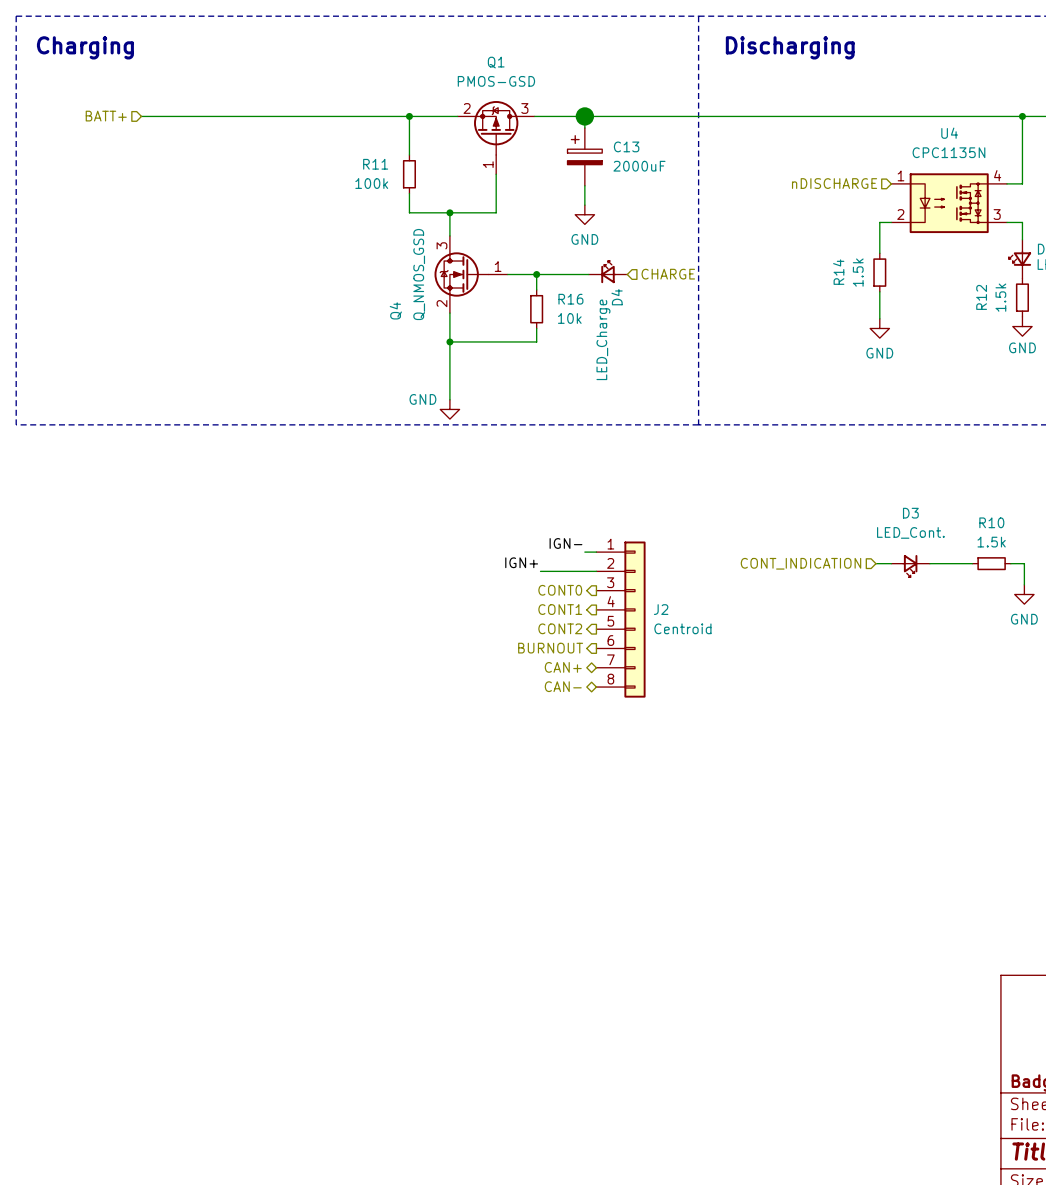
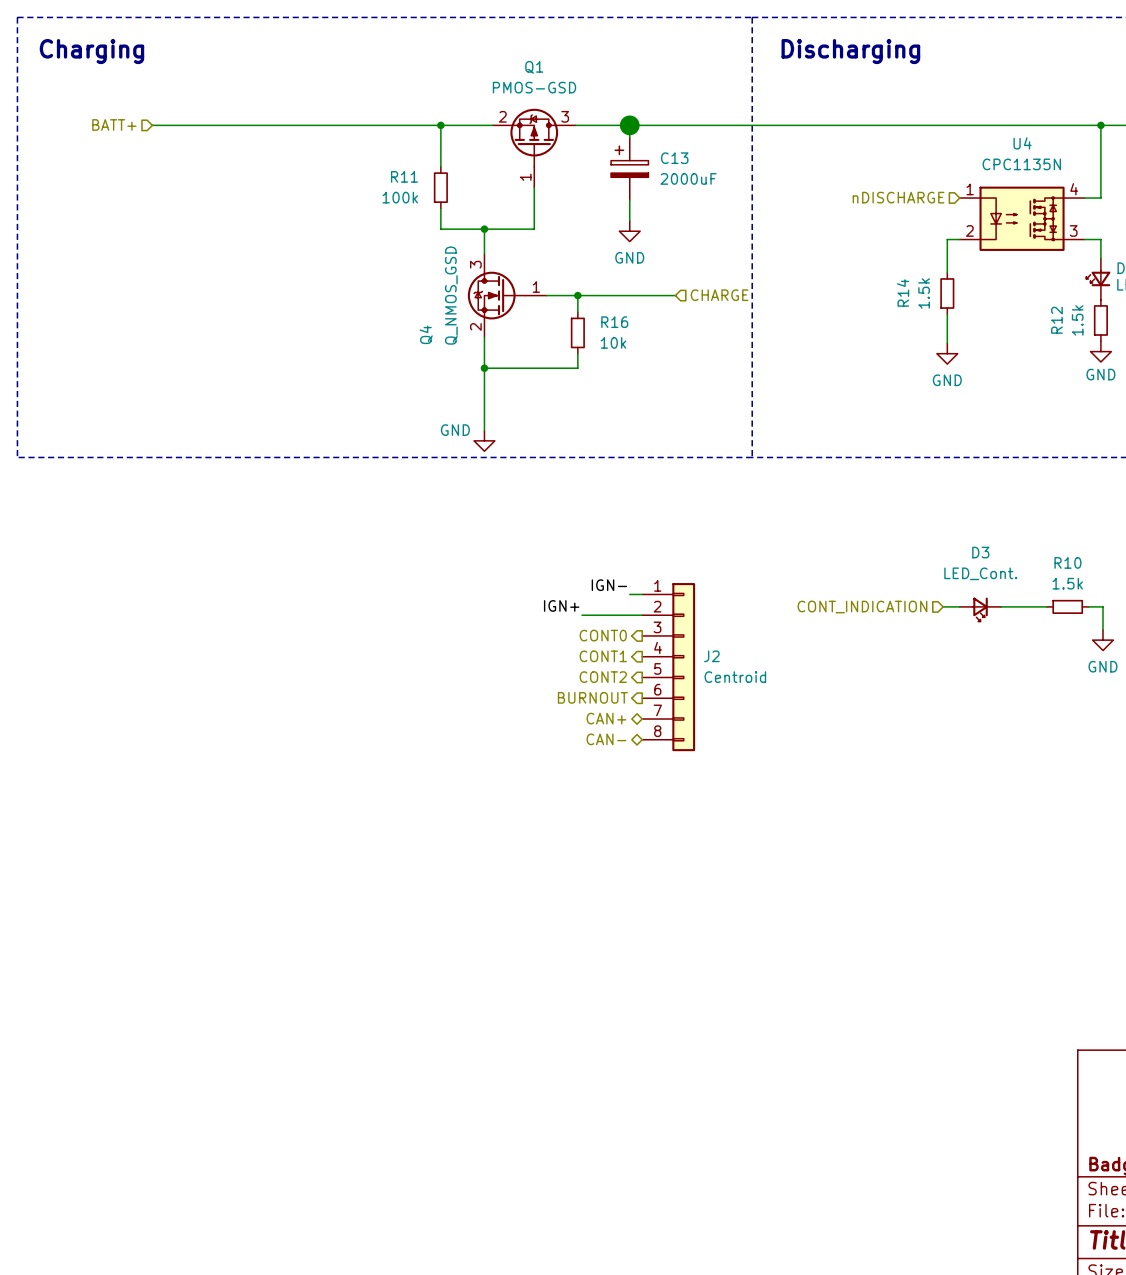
D4: LED_Charge (608, 272) -> none

